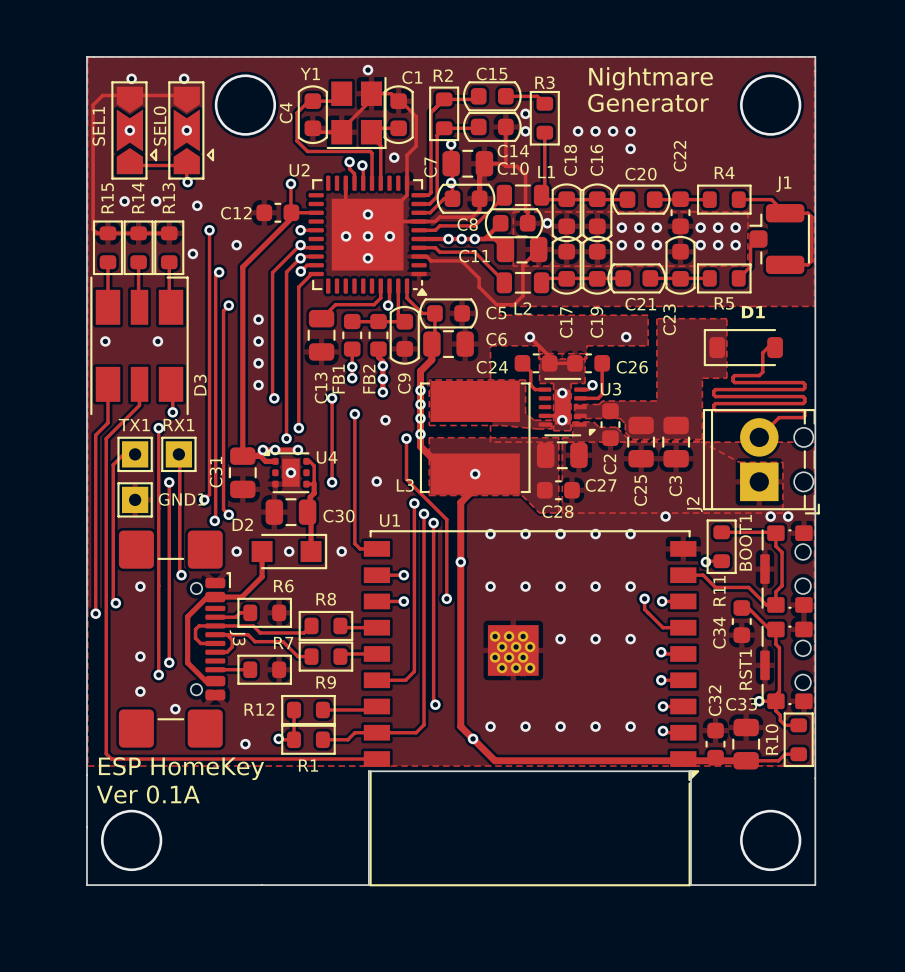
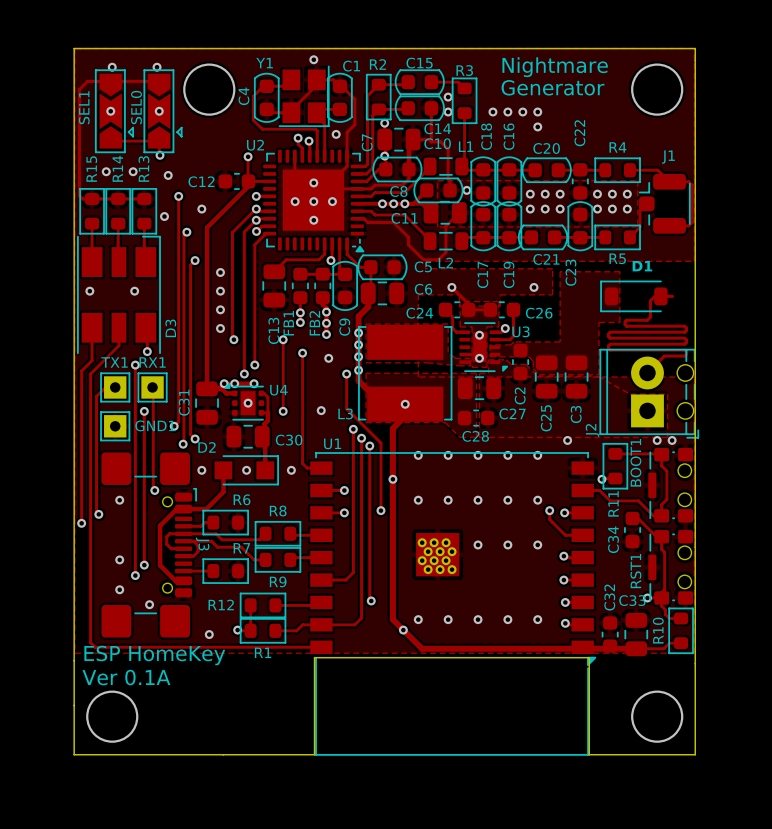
track: none -> (660, 296) (672, 296)

